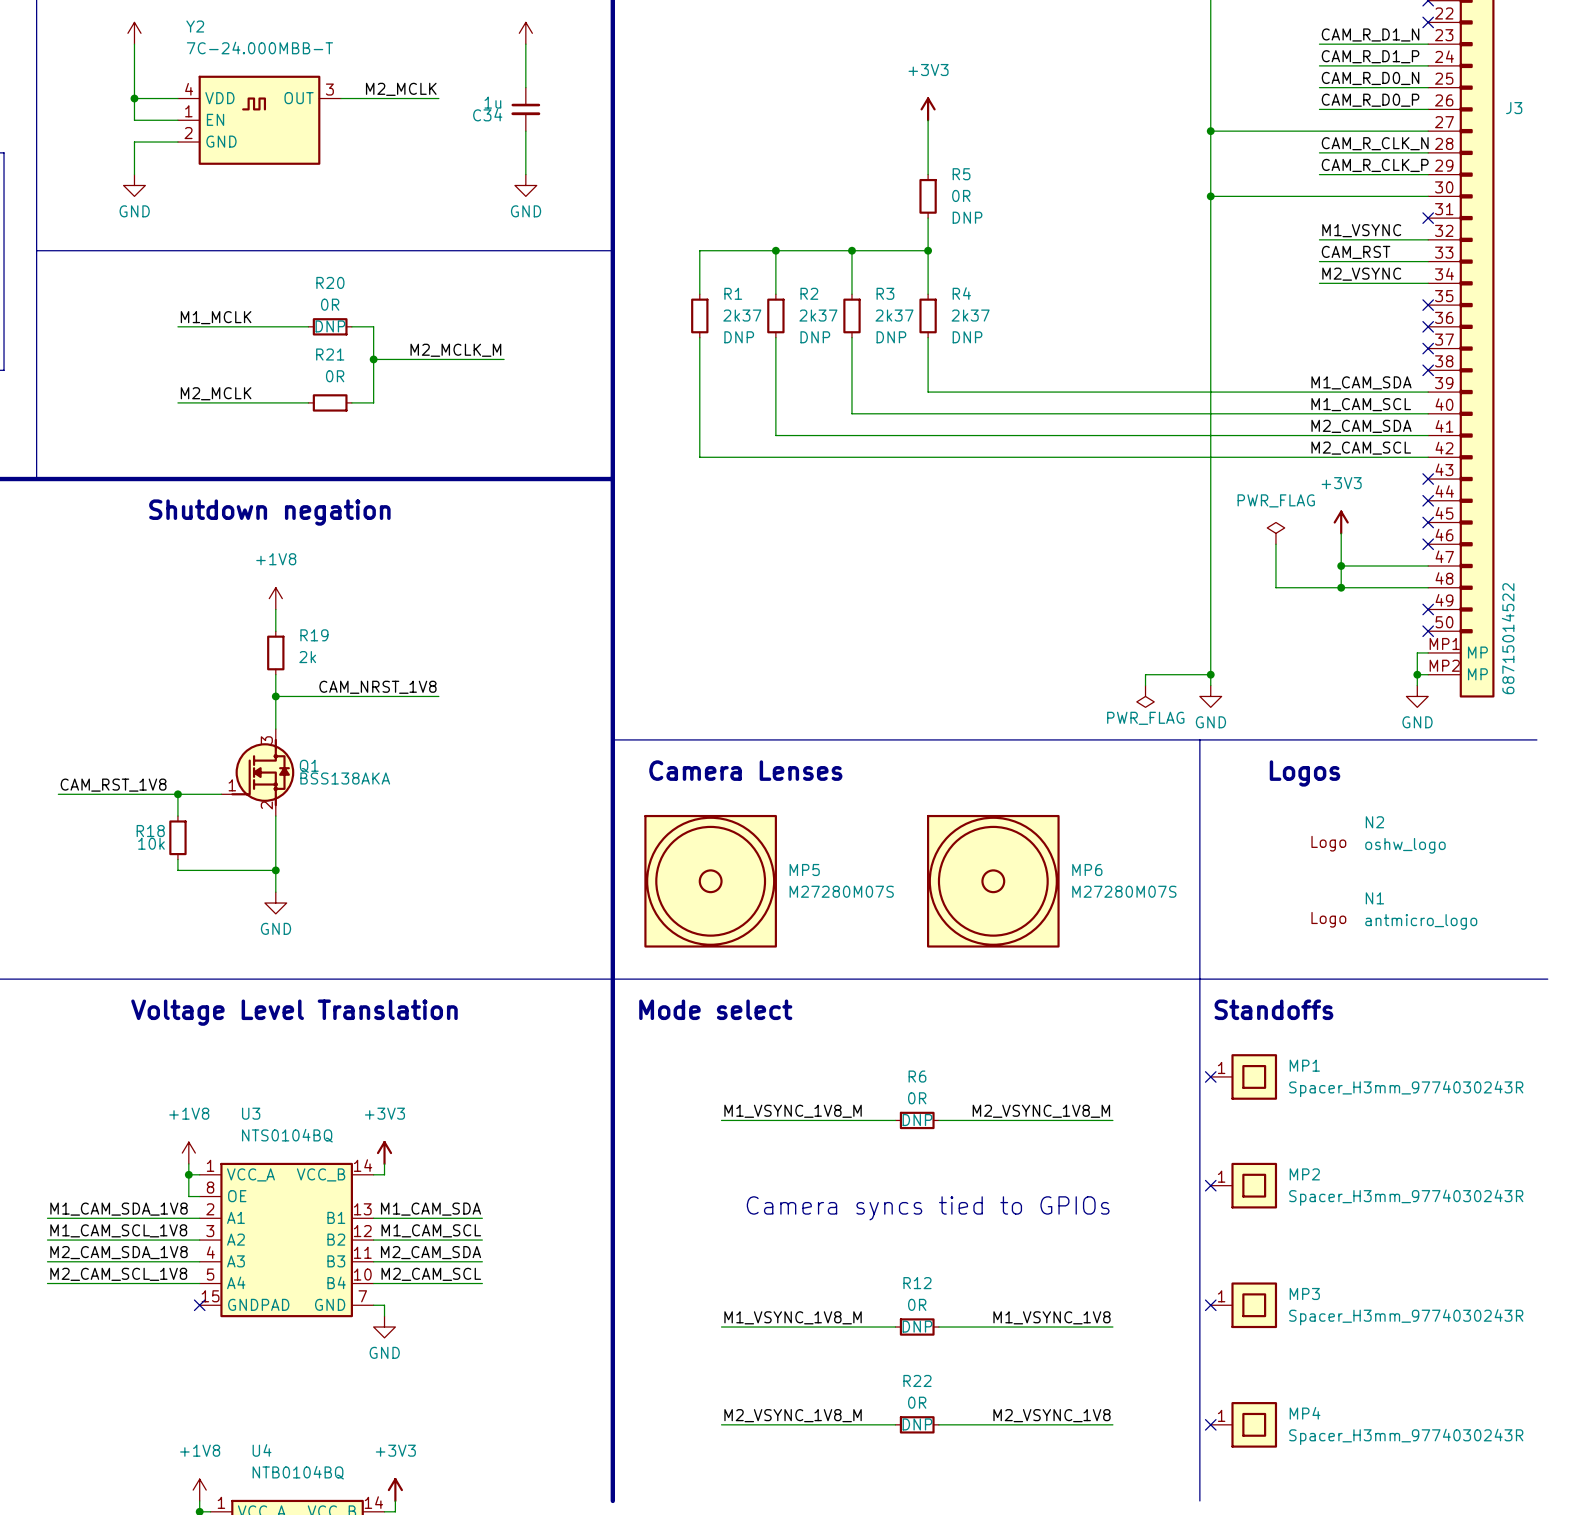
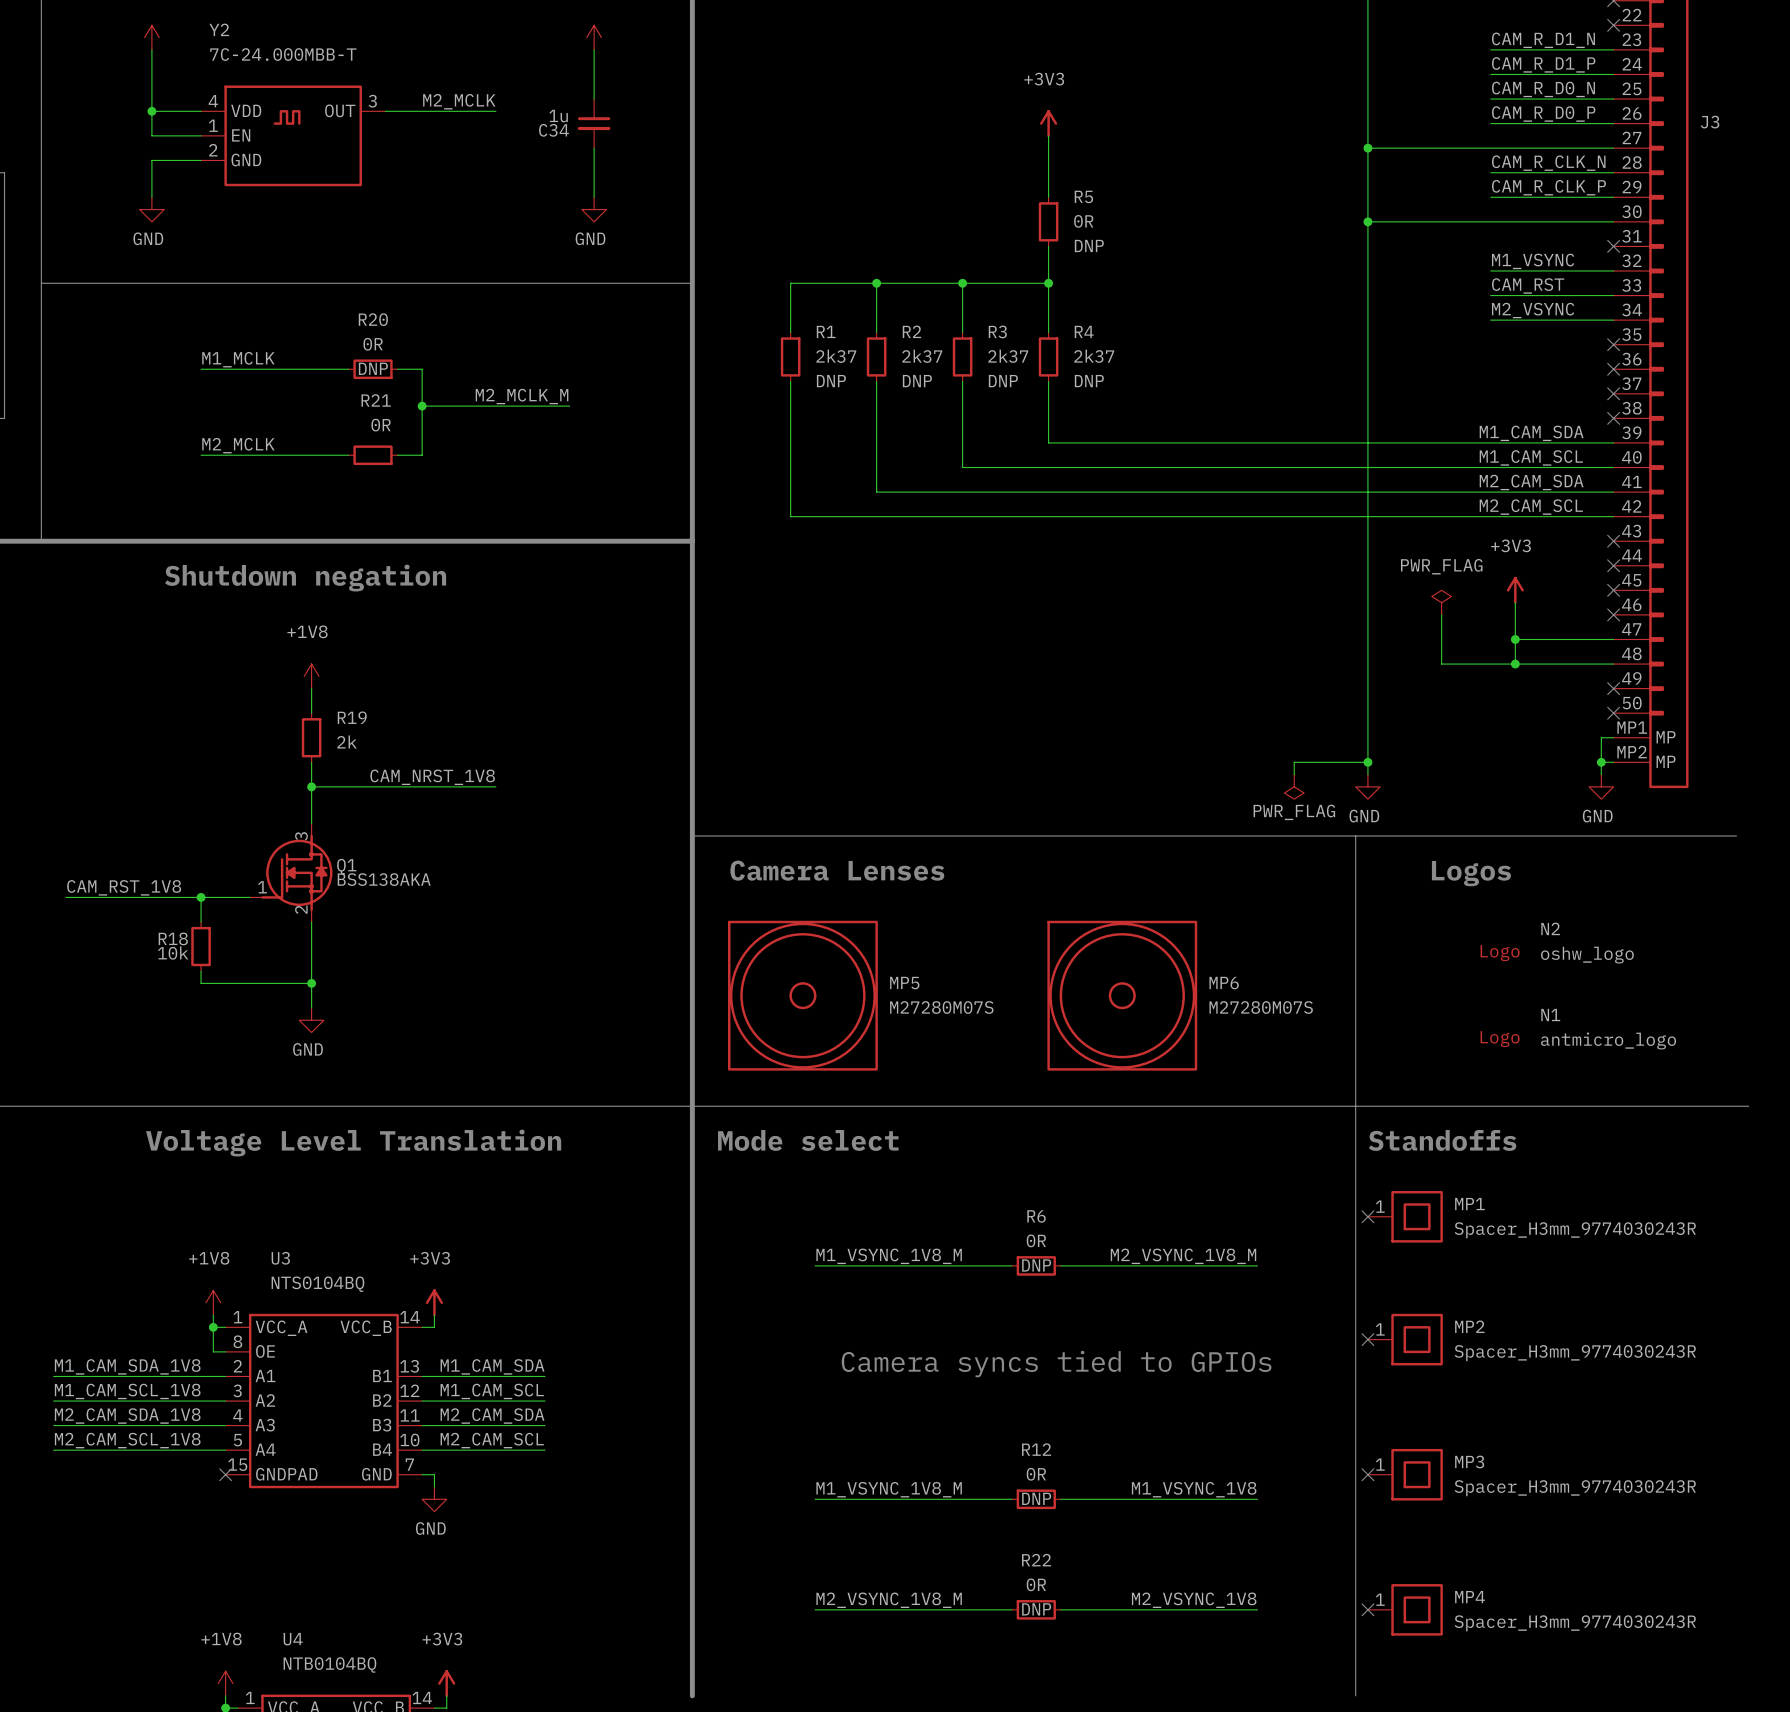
J3 text: 68715014522 (1508, 638) -> none

